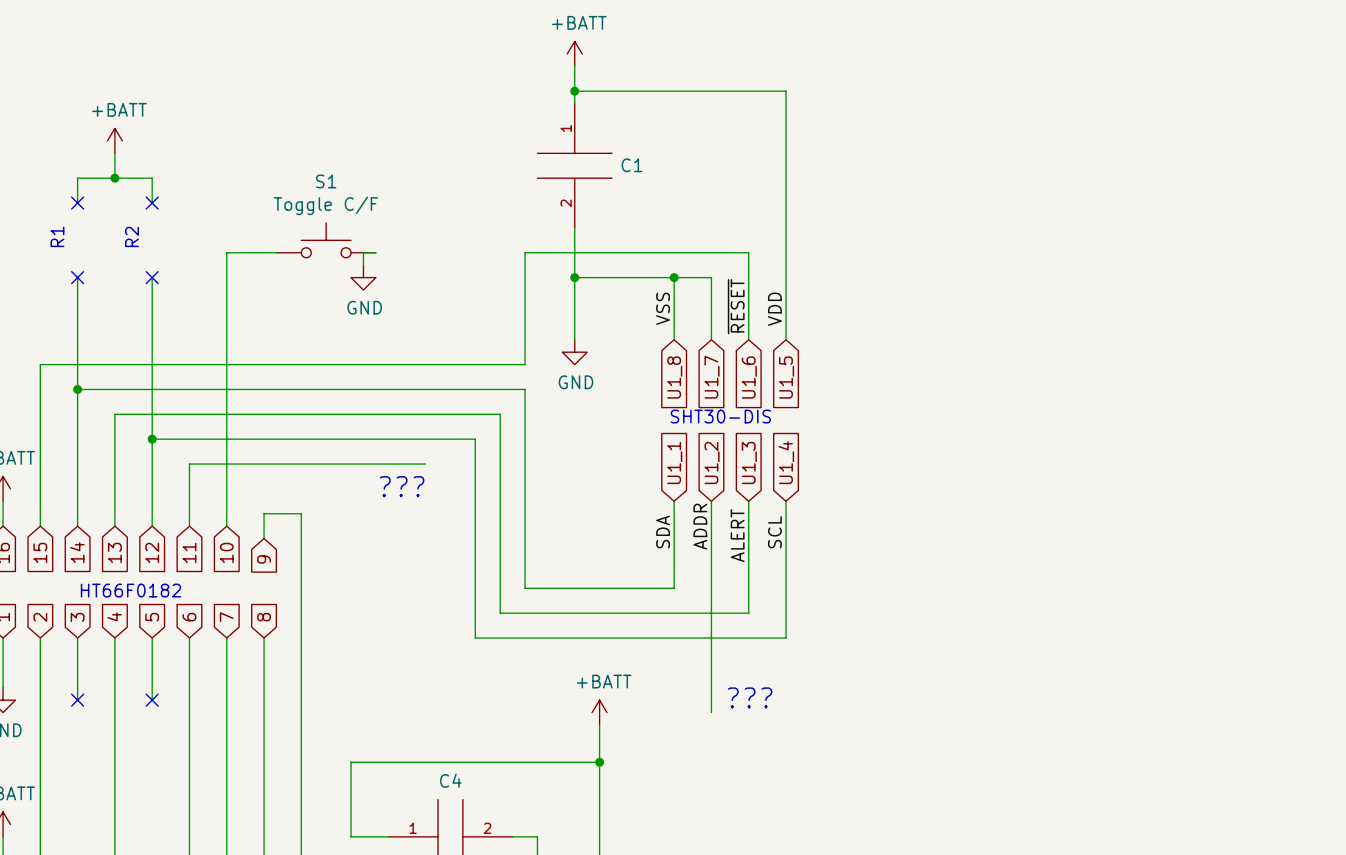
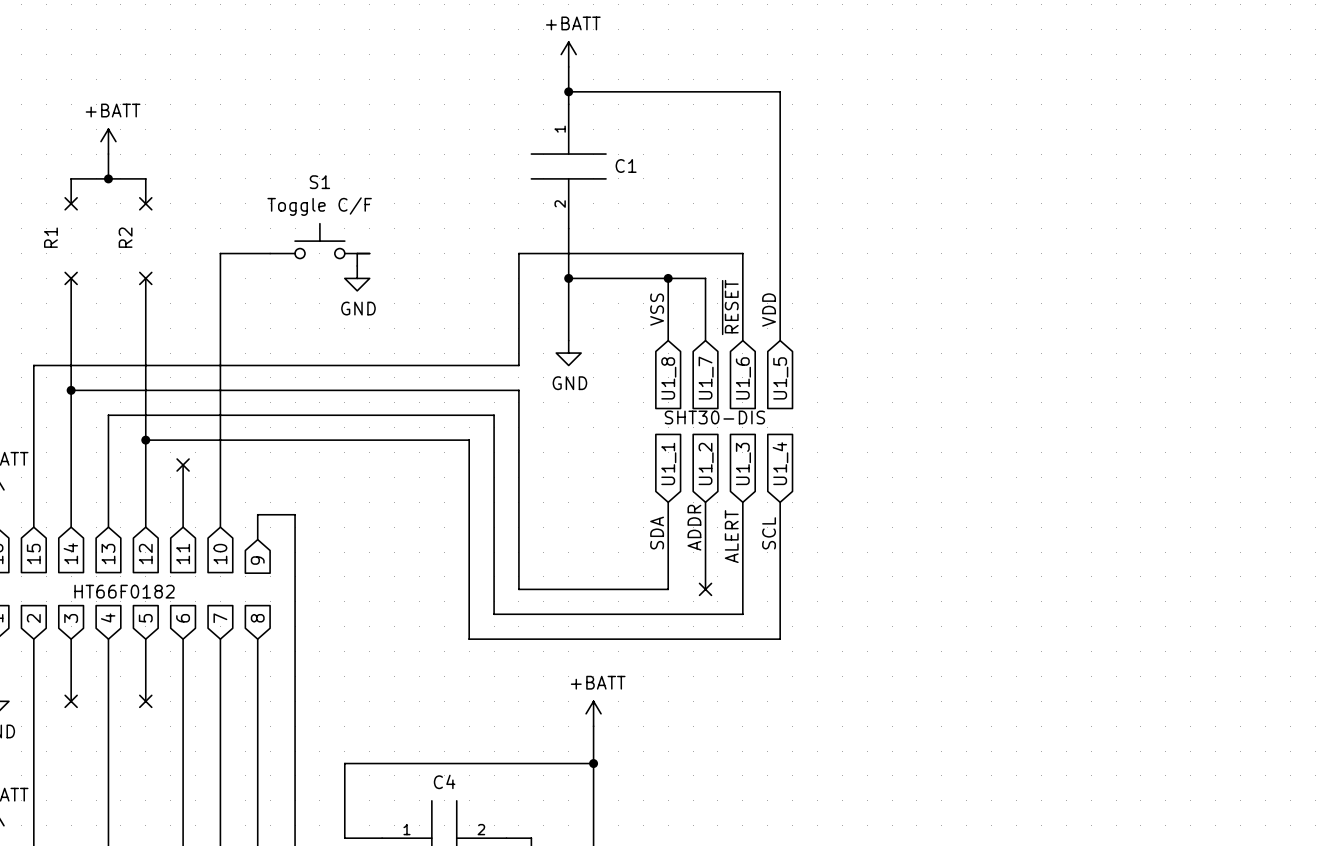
wire: (189, 464) (425, 464) -> none
no-connect mark: none -> (183, 465)
text: ??? (402, 486) -> none
wire: (711, 588) (711, 712) -> none
no-connect mark: none -> (705, 589)
text: ??? (750, 697) -> none

